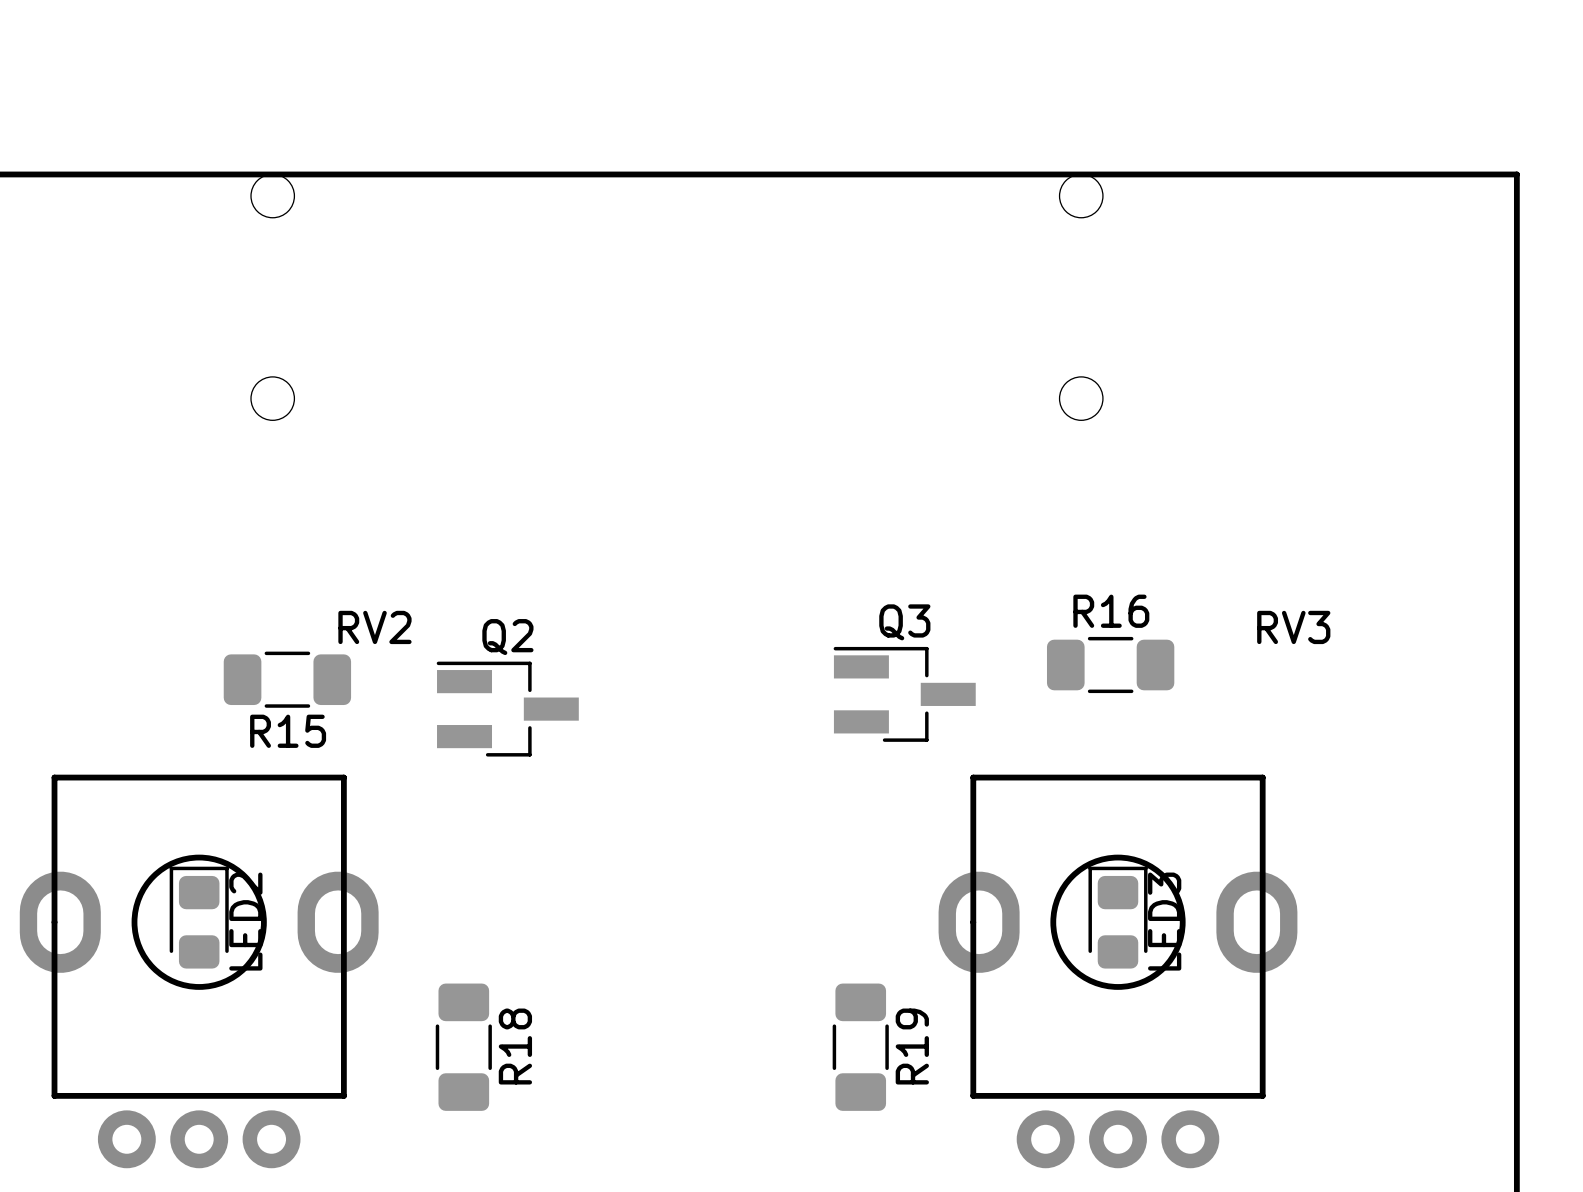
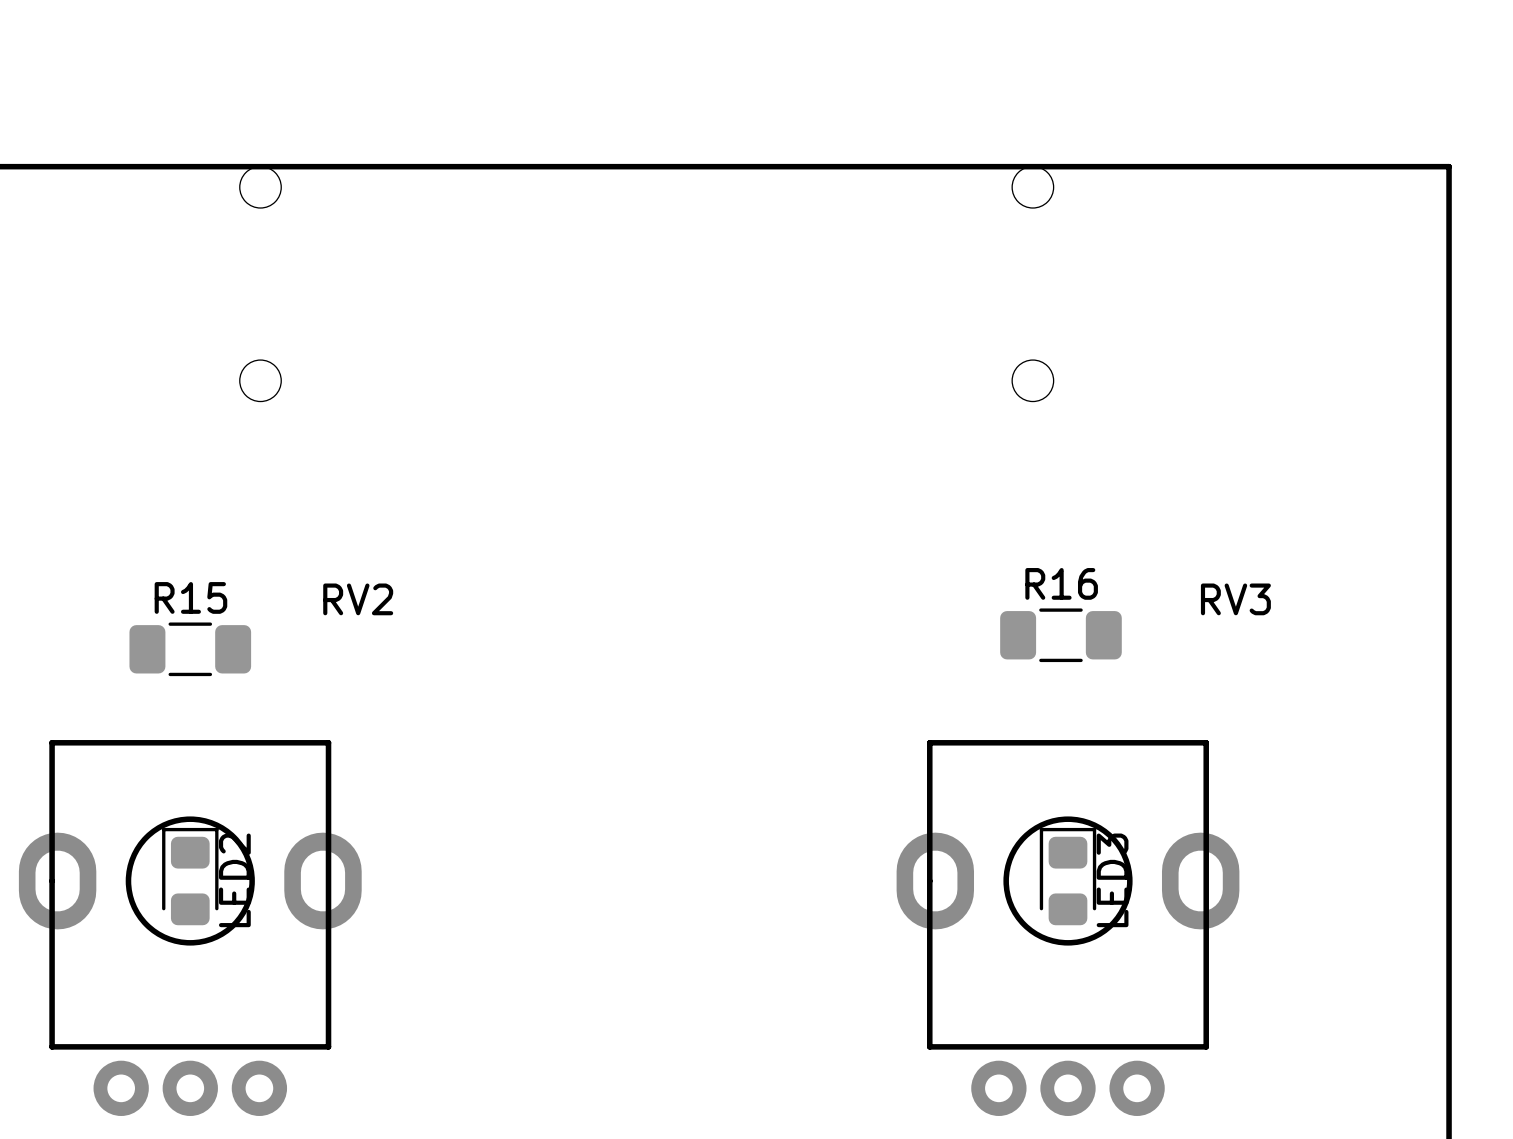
R15 position: (287, 679) -> (190, 649)
Q3: (904, 694) -> none
Q2: (507, 709) -> none
R15 name position: R15 (288, 731) -> R15 (190, 597)
R18: (463, 1047) -> none
R19: (860, 1047) -> none

